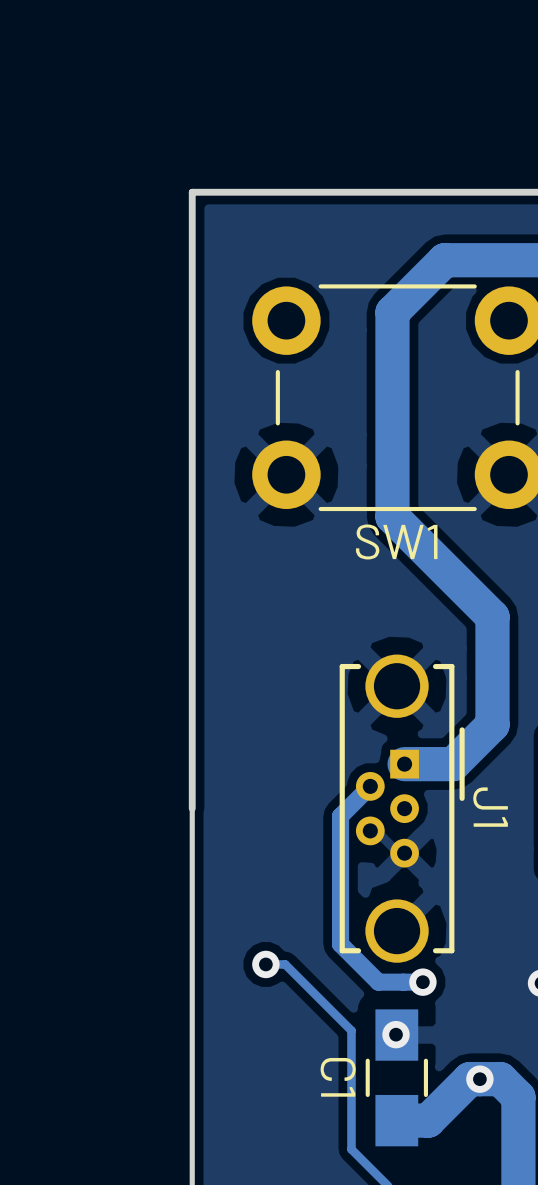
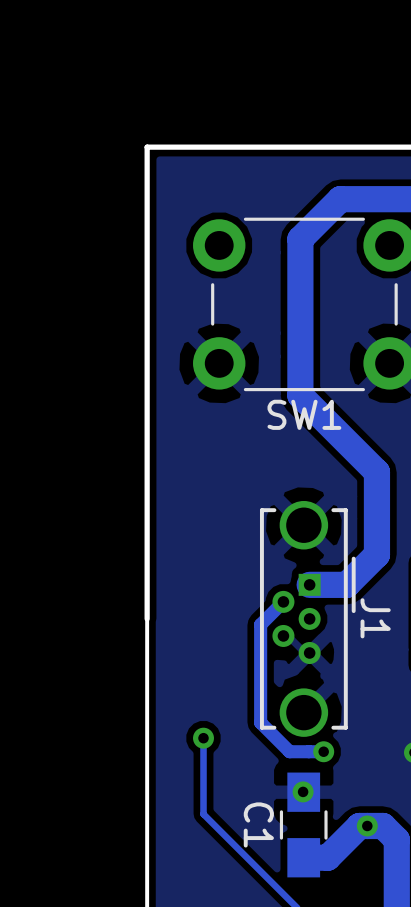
track: (265, 964) (285, 964) (351, 1030) (351, 1149) -> (203, 738) (203, 814) (269, 879)

